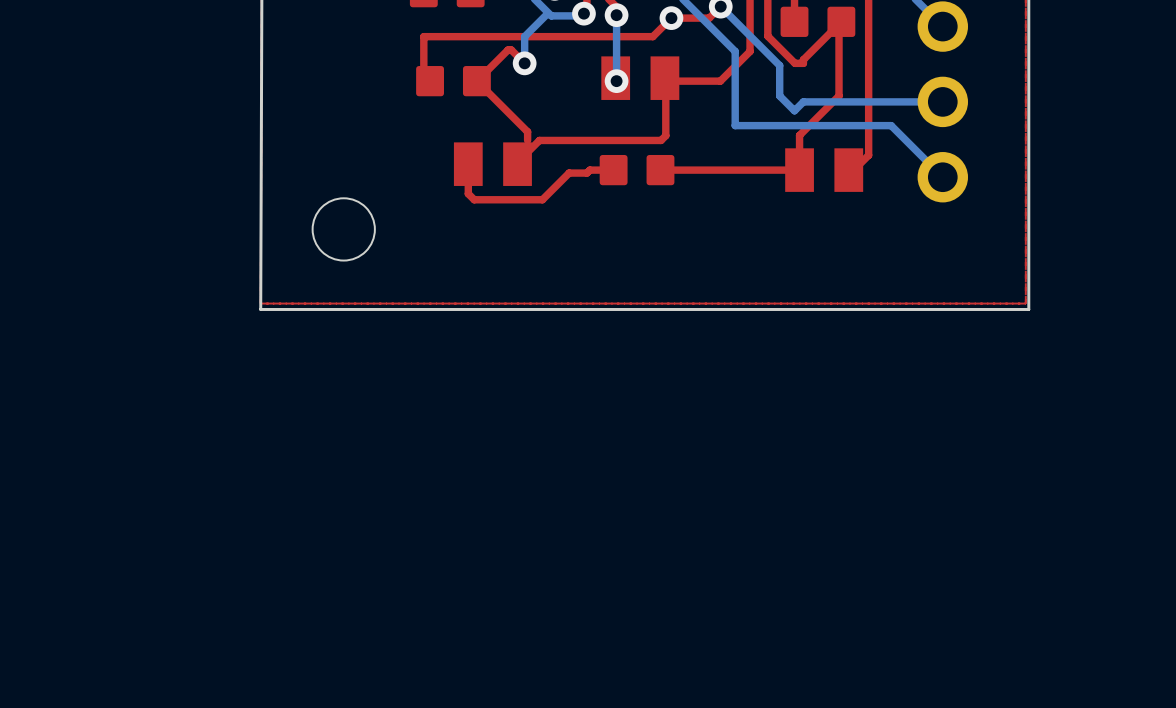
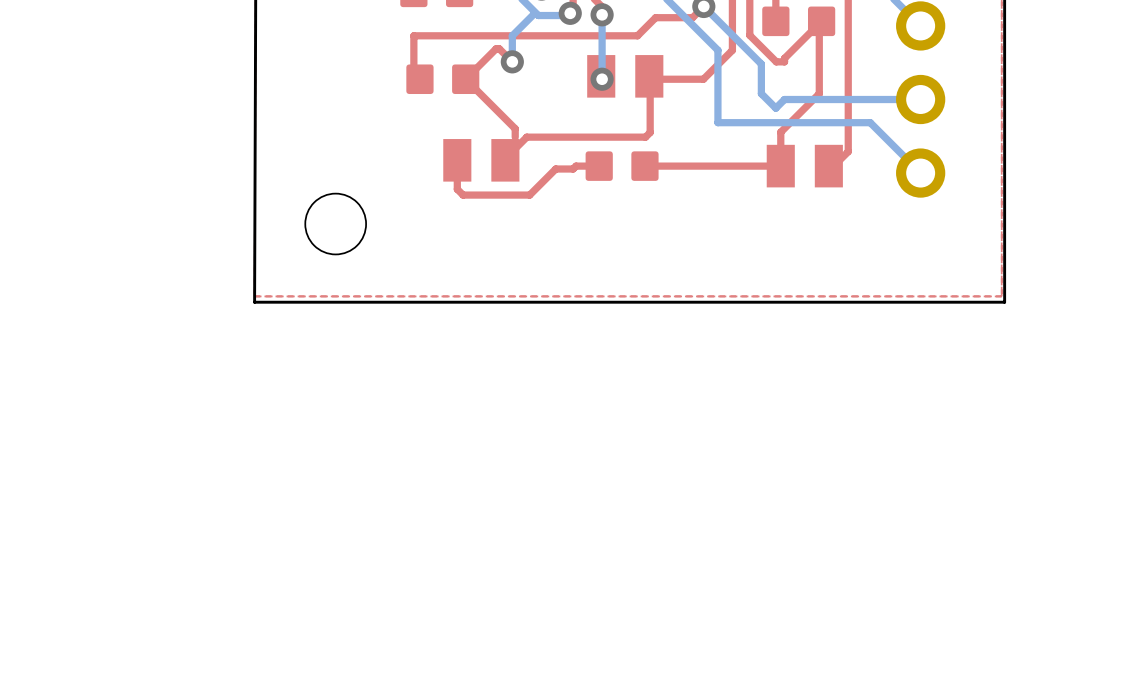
via: (671, 18) -> none

